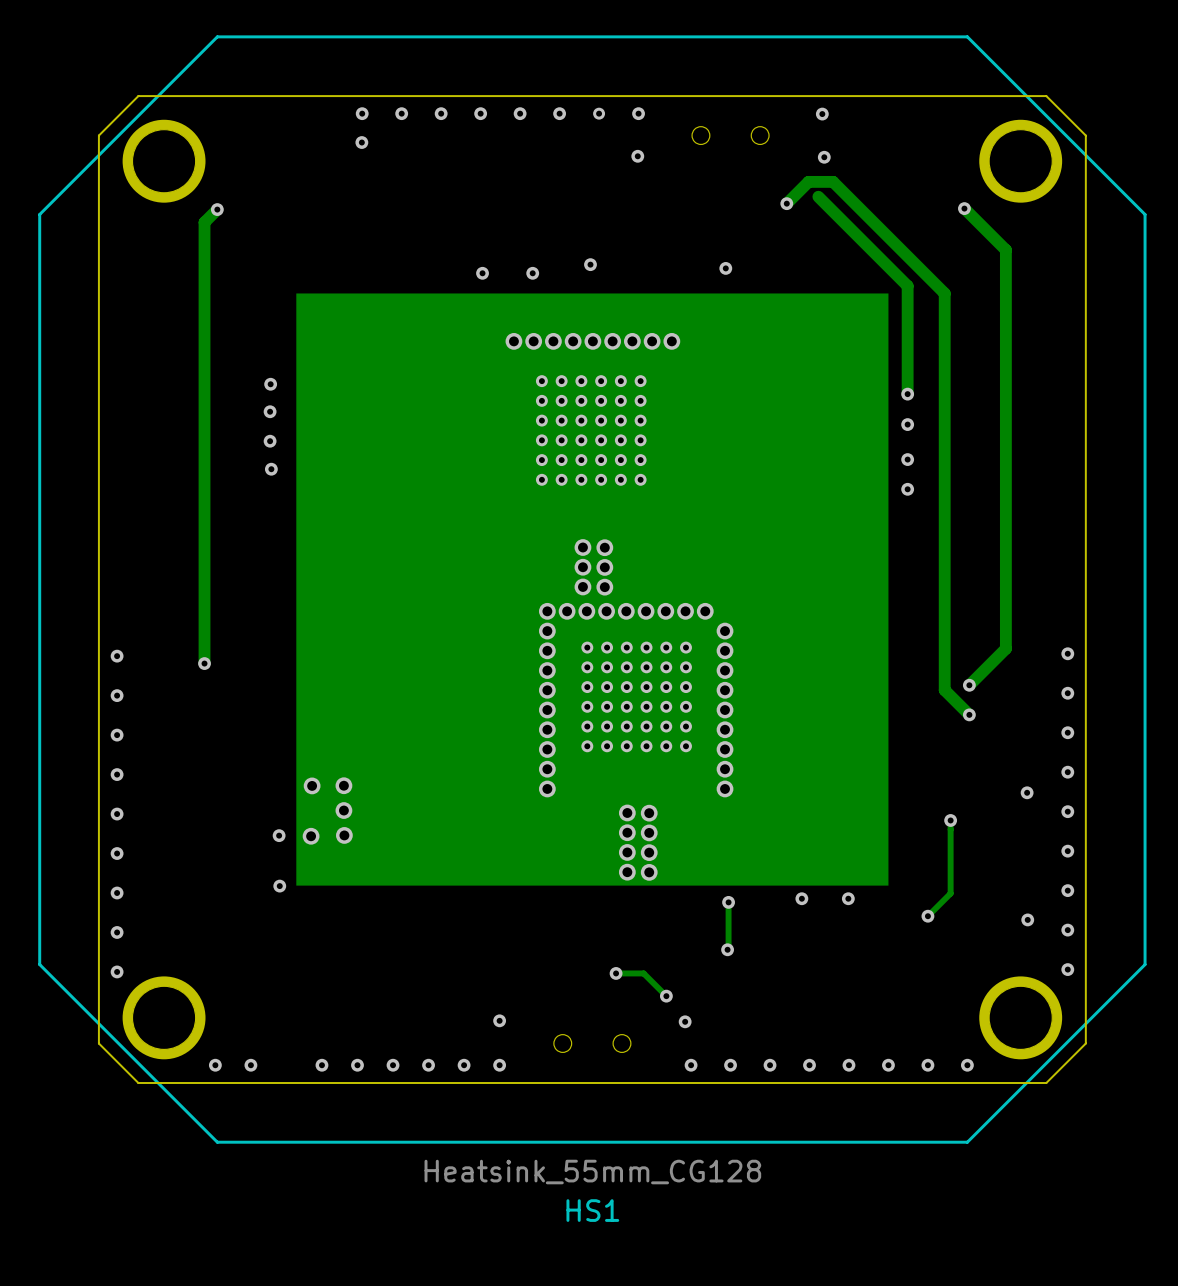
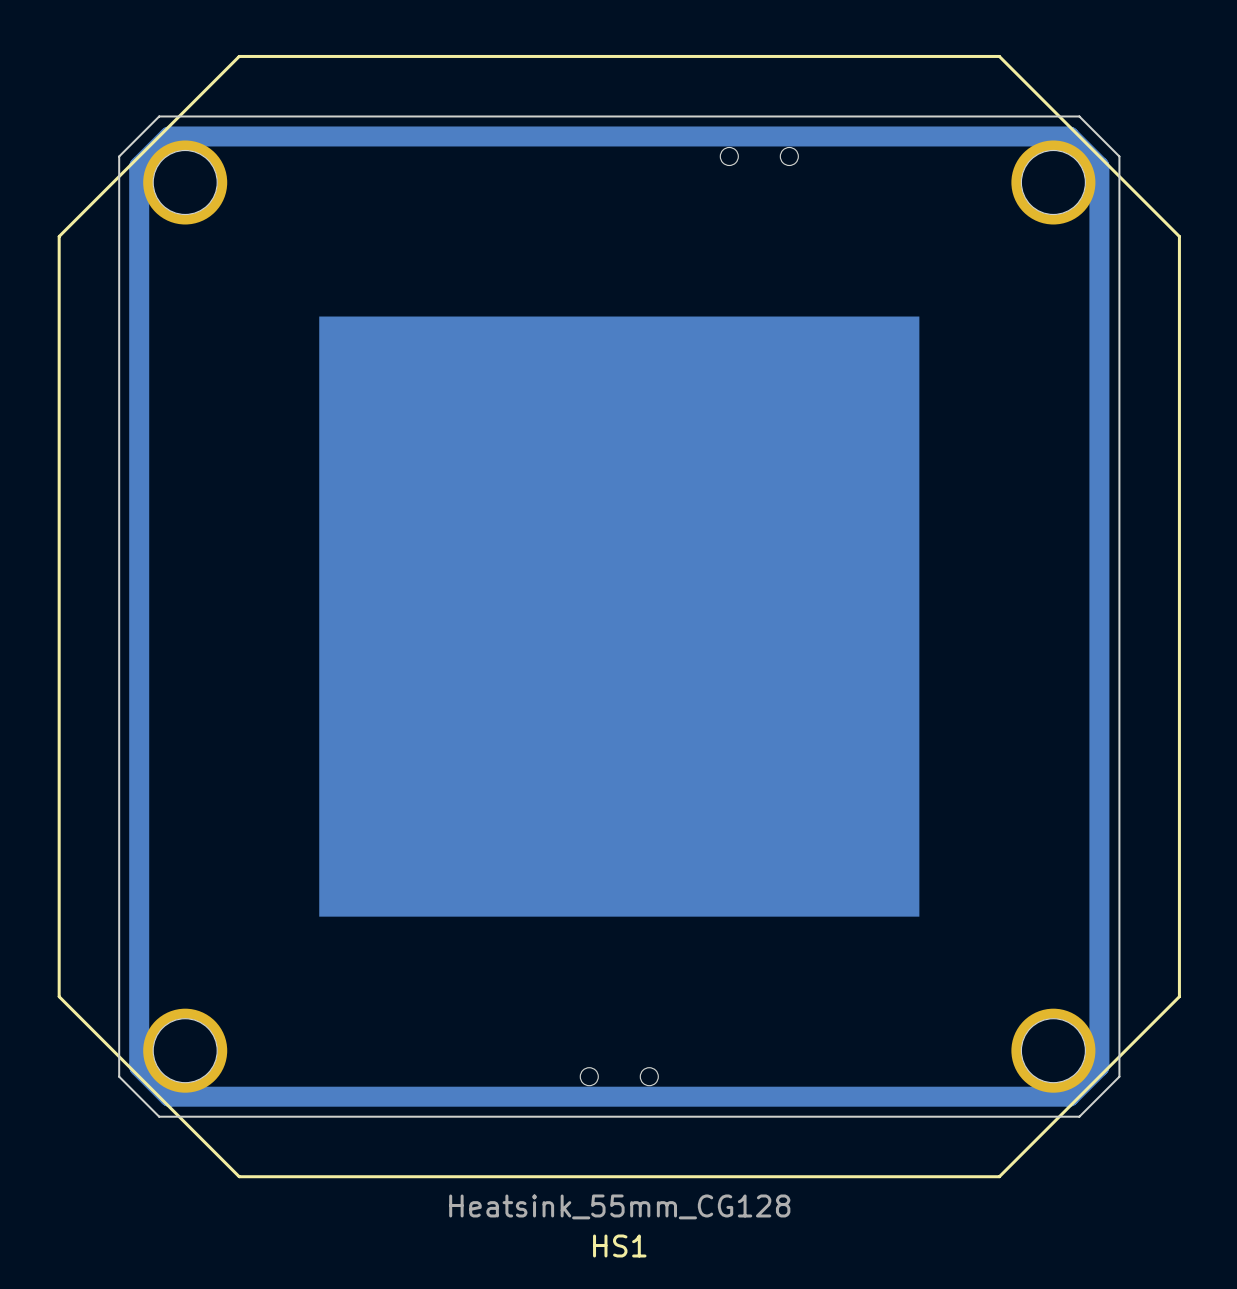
via: (362, 113) -> none
via: (401, 113) -> none
via: (441, 113) -> none
via: (480, 113) -> none
via: (520, 113) -> none
via: (559, 113) -> none
via: (599, 113) -> none
via: (638, 113) -> none
via: (822, 114) -> none
track: none -> (1069, 136) (1099, 166) (1099, 1066) (1069, 1096) (169, 1096) (139, 1066) (139, 166) (169, 136) (1069, 136)
via: (361, 142) -> none
via: (637, 156) -> none
via: (824, 157) -> none
track: (818, 196) (907, 286) (907, 394) -> none
track: (786, 203) (808, 181) (833, 181) (944, 293) (944, 690) (969, 714) -> none
via: (786, 203) -> none
track: (964, 208) (1005, 250) (1005, 648) (969, 685) -> none
via: (964, 208) -> none
track: (217, 209) (204, 222) (204, 663) -> none
via: (217, 209) -> none
via: (590, 264) -> none
via: (725, 268) -> none
via: (482, 273) -> none
via: (532, 273) -> none
via: (513, 341) -> none
via: (533, 341) -> none
via: (553, 341) -> none
via: (573, 341) -> none
via: (592, 341) -> none
via: (612, 341) -> none
via: (632, 341) -> none
via: (652, 341) -> none
via: (671, 341) -> none
via: (541, 381) -> none
via: (561, 381) -> none
via: (581, 381) -> none
via: (601, 381) -> none
via: (620, 381) -> none
via: (640, 381) -> none
via: (270, 384) -> none
via: (907, 394) -> none
via: (541, 400) -> none
via: (561, 400) -> none
via: (581, 400) -> none
via: (601, 400) -> none
via: (620, 400) -> none
via: (640, 400) -> none
via: (270, 411) -> none
via: (541, 420) -> none
via: (561, 420) -> none
via: (581, 420) -> none
via: (601, 420) -> none
via: (620, 420) -> none
via: (640, 420) -> none
via: (907, 424) -> none
via: (541, 440) -> none
via: (561, 440) -> none
via: (581, 440) -> none
via: (601, 440) -> none
via: (620, 440) -> none
via: (640, 440) -> none
via: (270, 441) -> none
via: (907, 459) -> none
via: (541, 460) -> none
via: (561, 460) -> none
via: (581, 460) -> none
via: (601, 460) -> none
via: (620, 460) -> none
via: (640, 460) -> none
via: (271, 469) -> none
via: (541, 479) -> none
via: (561, 479) -> none
via: (581, 479) -> none
via: (601, 479) -> none
via: (620, 479) -> none
via: (640, 479) -> none
via: (907, 489) -> none
via: (582, 547) -> none
via: (604, 547) -> none
via: (582, 567) -> none
via: (604, 567) -> none
via: (582, 586) -> none
via: (604, 587) -> none
via: (547, 611) -> none
via: (567, 611) -> none
via: (586, 611) -> none
via: (606, 611) -> none
via: (626, 611) -> none
via: (646, 611) -> none
via: (665, 611) -> none
via: (685, 611) -> none
via: (705, 611) -> none
via: (547, 631) -> none
via: (725, 631) -> none
via: (587, 647) -> none
via: (607, 647) -> none
via: (626, 647) -> none
via: (646, 647) -> none
via: (666, 647) -> none
via: (685, 647) -> none
via: (547, 650) -> none
via: (725, 650) -> none
via: (1067, 653) -> none
via: (117, 656) -> none
via: (204, 663) -> none
via: (587, 667) -> none
via: (607, 667) -> none
via: (626, 667) -> none
via: (646, 667) -> none
via: (666, 667) -> none
via: (685, 667) -> none
via: (547, 670) -> none
via: (725, 670) -> none
via: (969, 685) -> none
via: (587, 687) -> none
via: (607, 687) -> none
via: (626, 687) -> none
via: (646, 687) -> none
via: (666, 687) -> none
via: (685, 687) -> none
via: (547, 690) -> none
via: (725, 690) -> none
via: (1067, 693) -> none
via: (117, 695) -> none
via: (587, 706) -> none
via: (607, 706) -> none
via: (626, 706) -> none
via: (646, 706) -> none
via: (666, 706) -> none
via: (685, 706) -> none
via: (547, 710) -> none
via: (725, 710) -> none
via: (969, 714) -> none
via: (587, 726) -> none
via: (607, 726) -> none
via: (626, 726) -> none
via: (646, 726) -> none
via: (666, 726) -> none
via: (685, 726) -> none
via: (547, 729) -> none
via: (725, 729) -> none
via: (1067, 732) -> none
via: (117, 735) -> none
via: (587, 746) -> none
via: (607, 746) -> none
via: (626, 746) -> none
via: (646, 746) -> none
via: (666, 746) -> none
via: (685, 746) -> none
via: (547, 749) -> none
via: (725, 749) -> none
via: (547, 769) -> none
via: (725, 769) -> none
via: (1067, 772) -> none
via: (117, 774) -> none
via: (312, 785) -> none
via: (343, 785) -> none
via: (547, 788) -> none
via: (725, 788) -> none
via: (1027, 792) -> none
via: (343, 810) -> none
via: (1067, 811) -> none
via: (627, 812) -> none
via: (649, 813) -> none
via: (117, 814) -> none
track: (950, 820) (950, 893) (927, 916) -> none
via: (950, 820) -> none
via: (627, 832) -> none
via: (649, 832) -> none
via: (279, 835) -> none
via: (344, 835) -> none
via: (311, 836) -> none
via: (1067, 851) -> none
via: (627, 852) -> none
via: (649, 852) -> none
via: (117, 853) -> none
via: (627, 872) -> none
via: (649, 872) -> none
via: (279, 886) -> none
via: (1067, 890) -> none
via: (117, 893) -> none
via: (801, 898) -> none
via: (848, 898) -> none
track: (728, 902) (727, 949) -> none
via: (728, 902) -> none
via: (927, 916) -> none
via: (1027, 919) -> none
via: (1067, 930) -> none
via: (117, 932) -> none
via: (727, 949) -> none
via: (1067, 969) -> none
via: (117, 971) -> none
track: (616, 973) (643, 973) (666, 996) -> none
via: (616, 973) -> none
via: (666, 996) -> none
via: (499, 1020) -> none
via: (685, 1021) -> none
via: (215, 1065) -> none
via: (250, 1065) -> none
via: (321, 1065) -> none
via: (357, 1065) -> none
via: (393, 1065) -> none
via: (428, 1065) -> none
via: (464, 1065) -> none
via: (499, 1065) -> none
via: (691, 1065) -> none
via: (730, 1065) -> none
via: (770, 1065) -> none
via: (809, 1065) -> none
via: (848, 1065) -> none
via: (888, 1065) -> none
via: (927, 1065) -> none
via: (967, 1065) -> none

